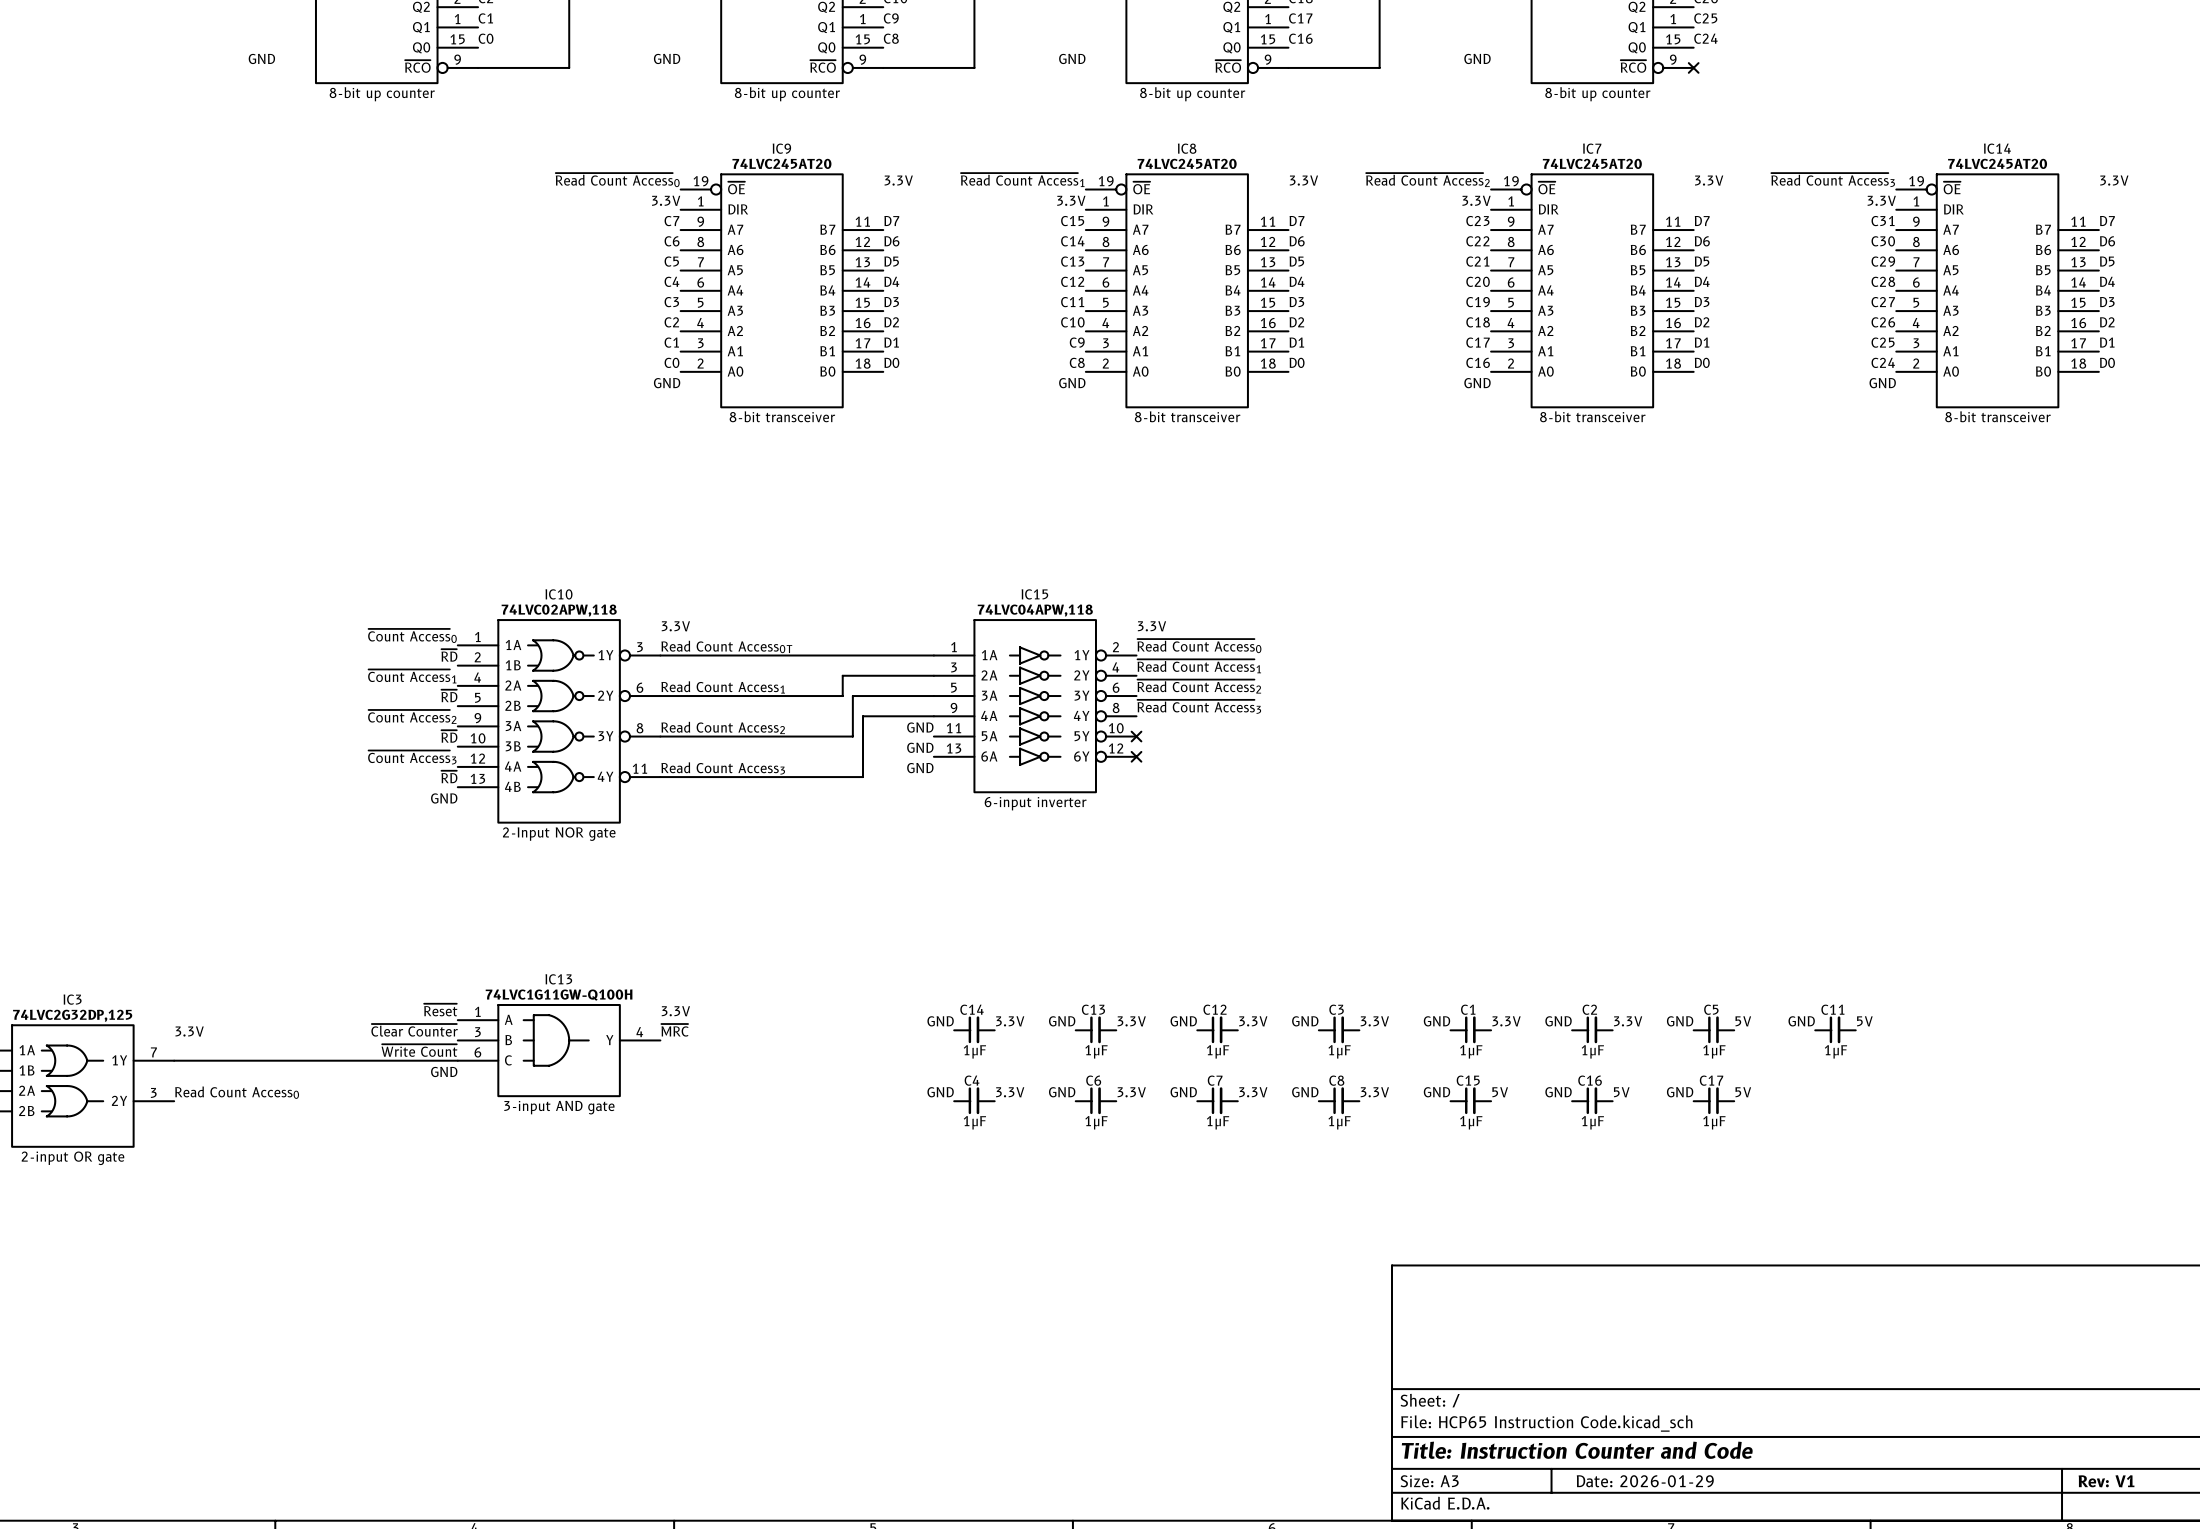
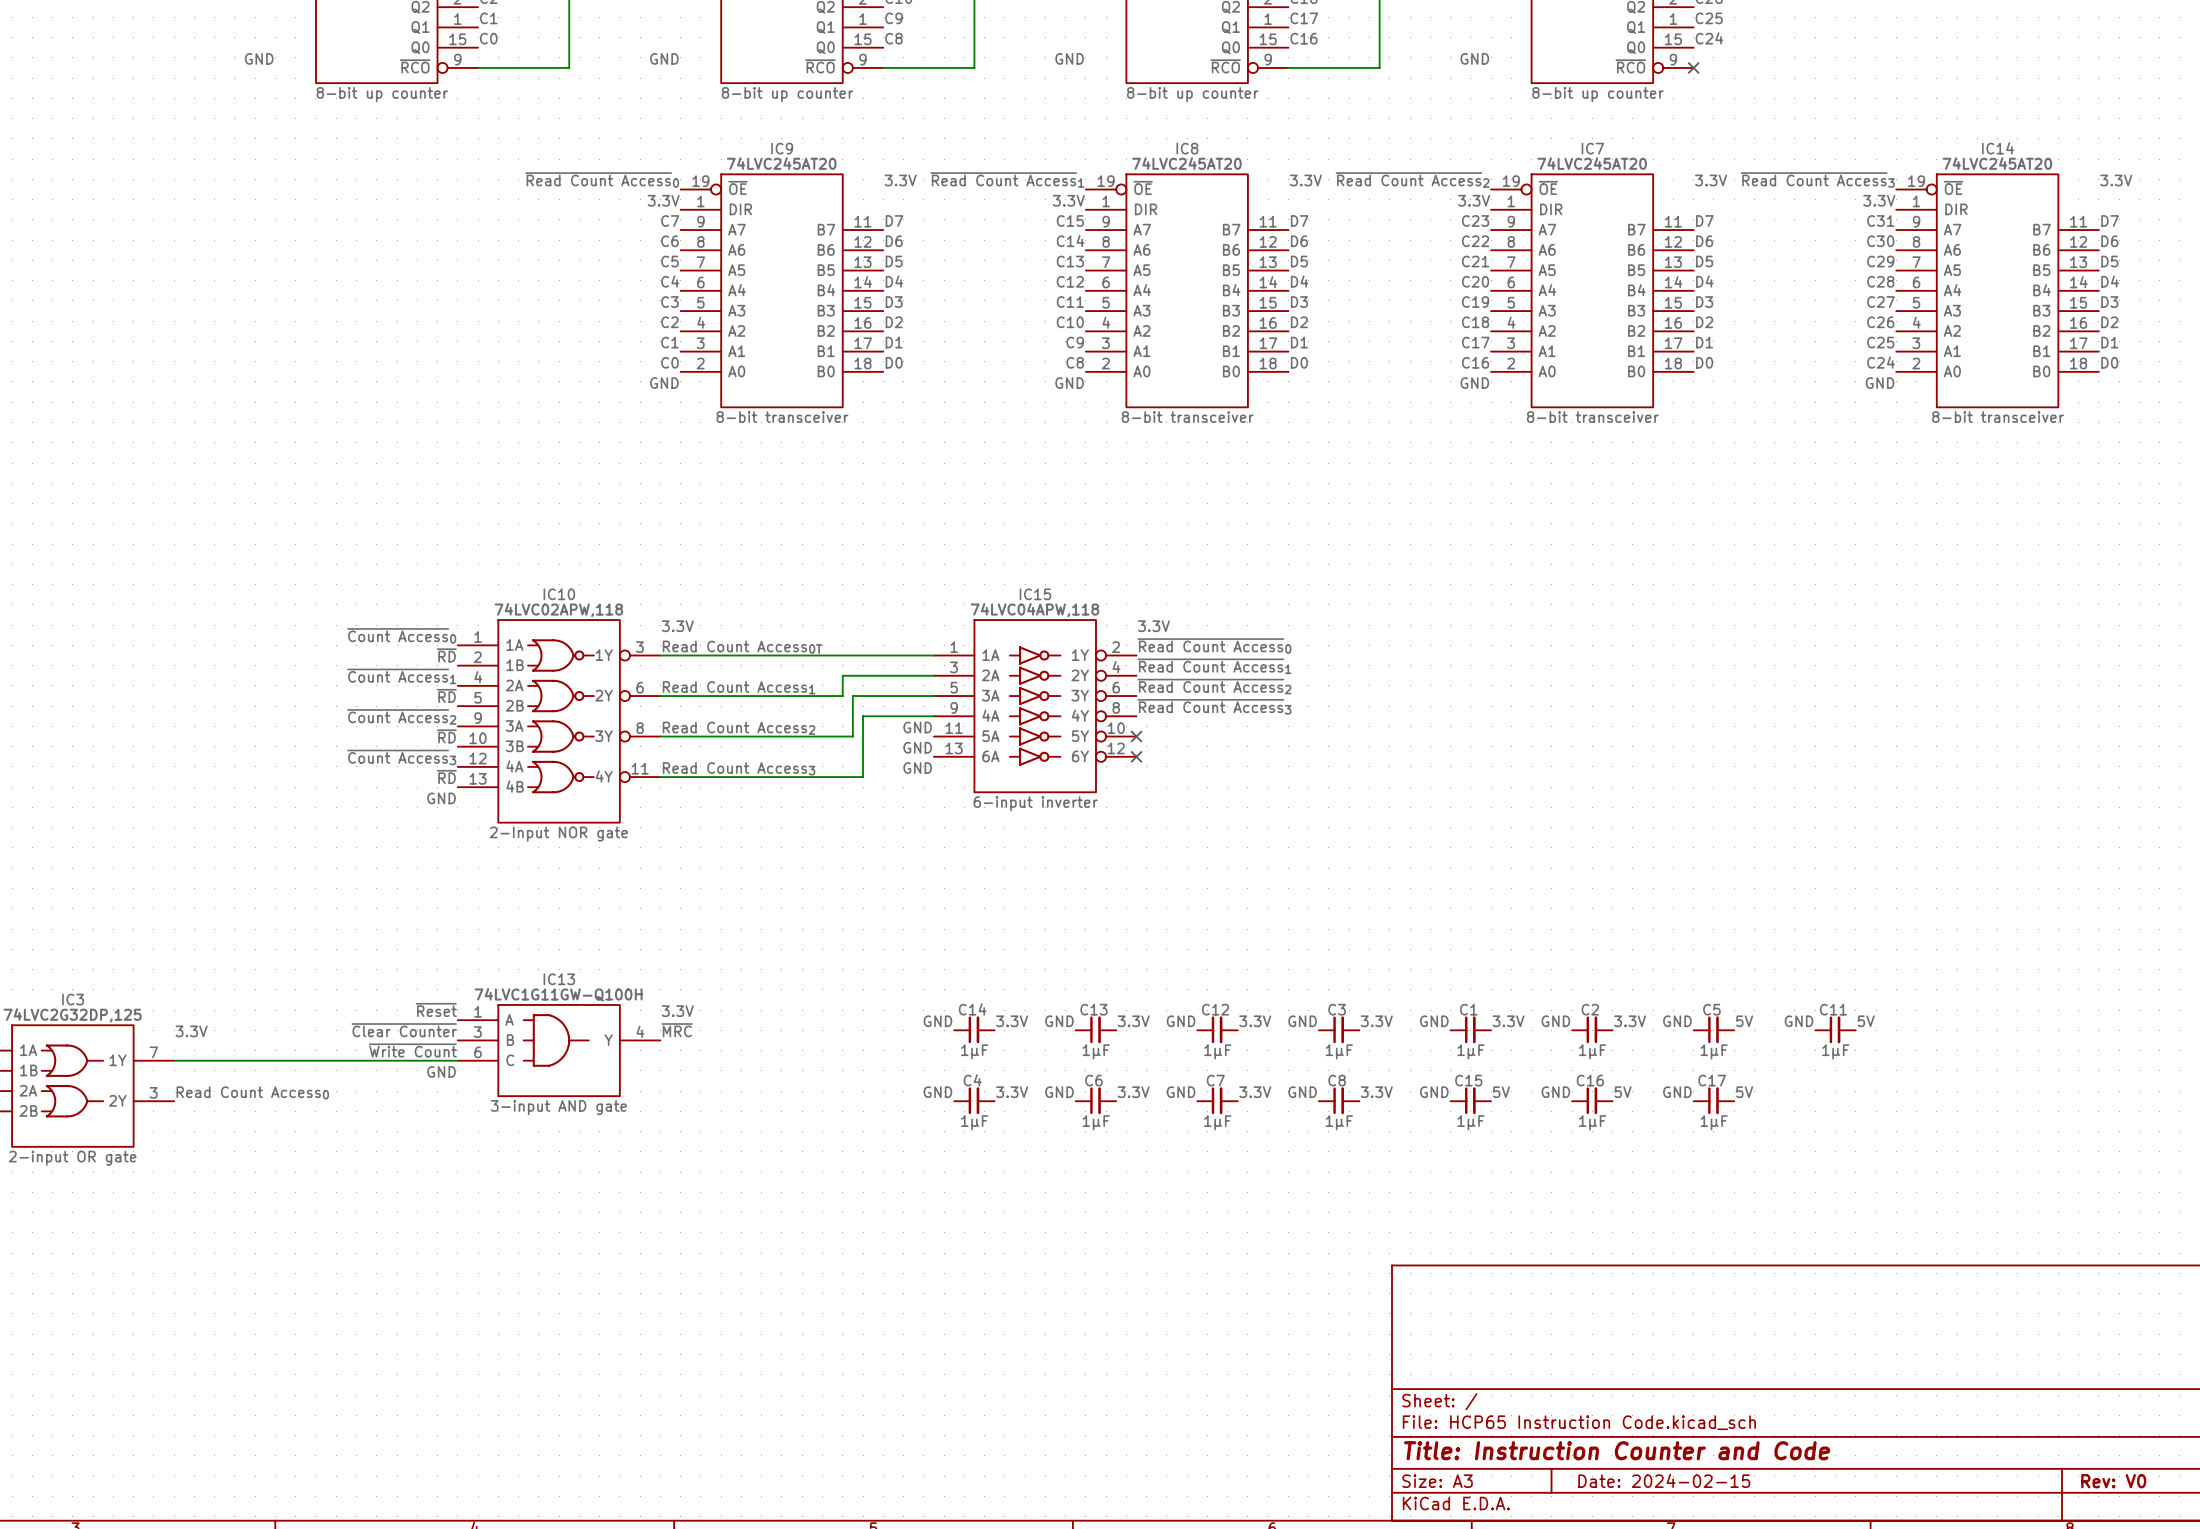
title block: Date: 2026-01-29 (1645, 1481) -> Date: 2024-02-15 (1664, 1480)
title block: Rev: V1 (2106, 1481) -> Rev: V0 (2113, 1481)

